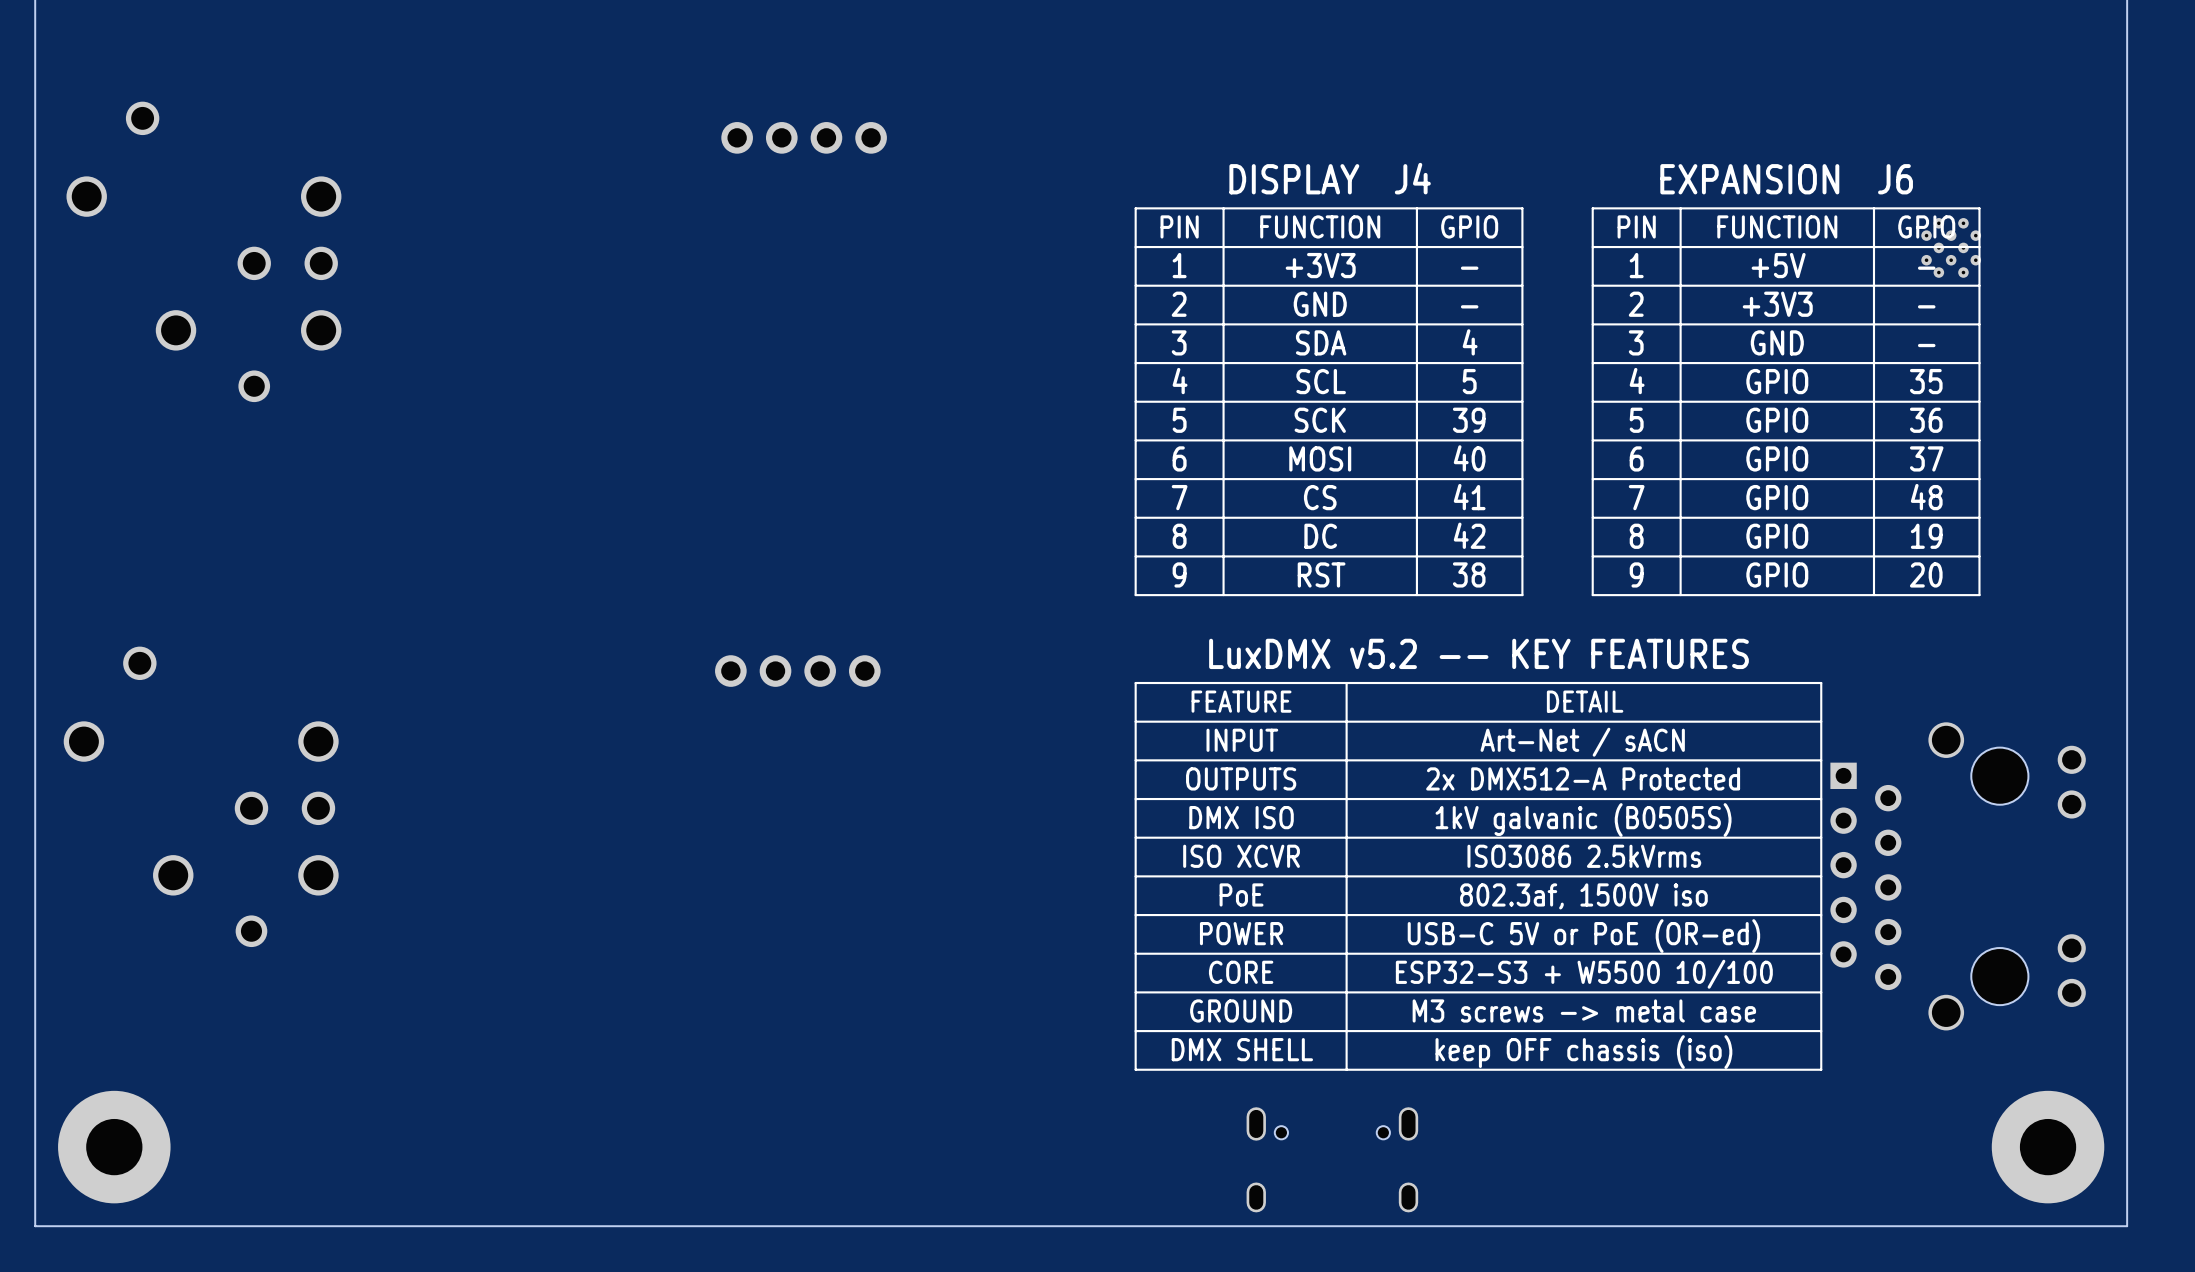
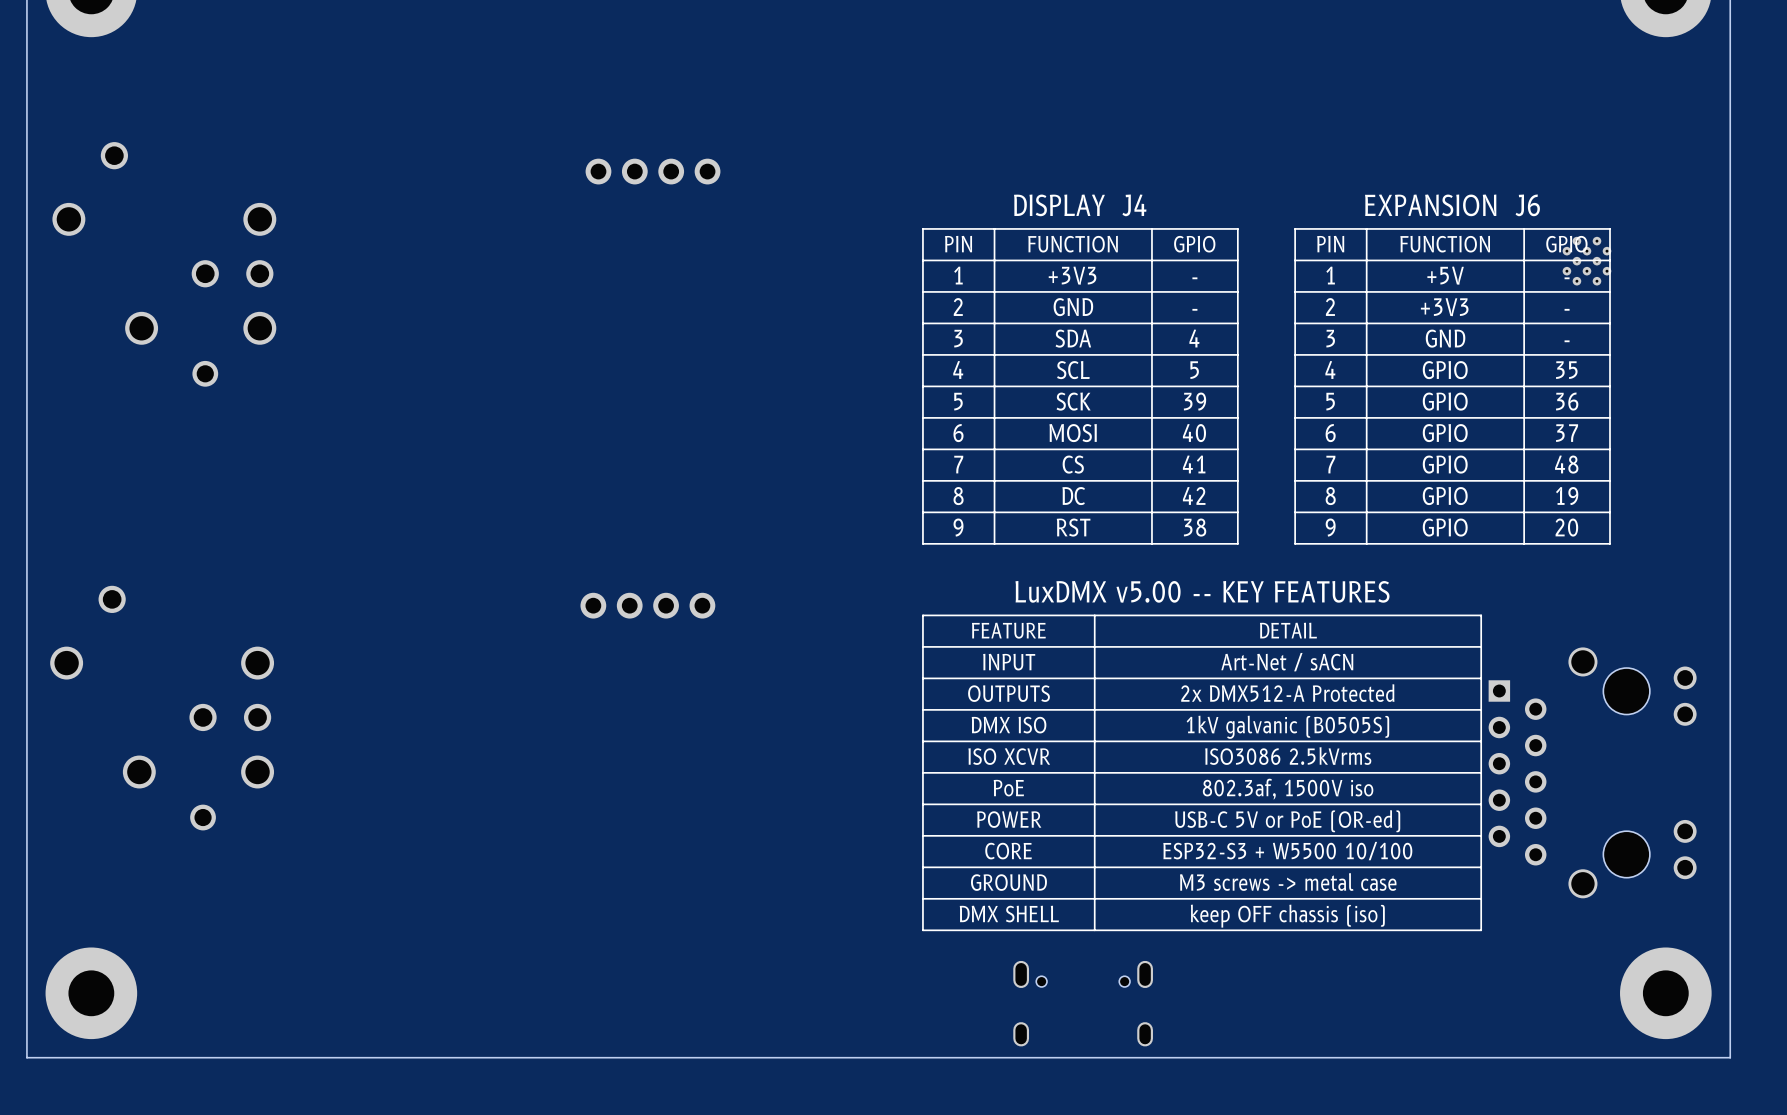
text: LuxDMX v5.2 -- KEY FEATURES (1478, 653) -> LuxDMX v5.00 -- KEY FEATURES (1202, 591)

